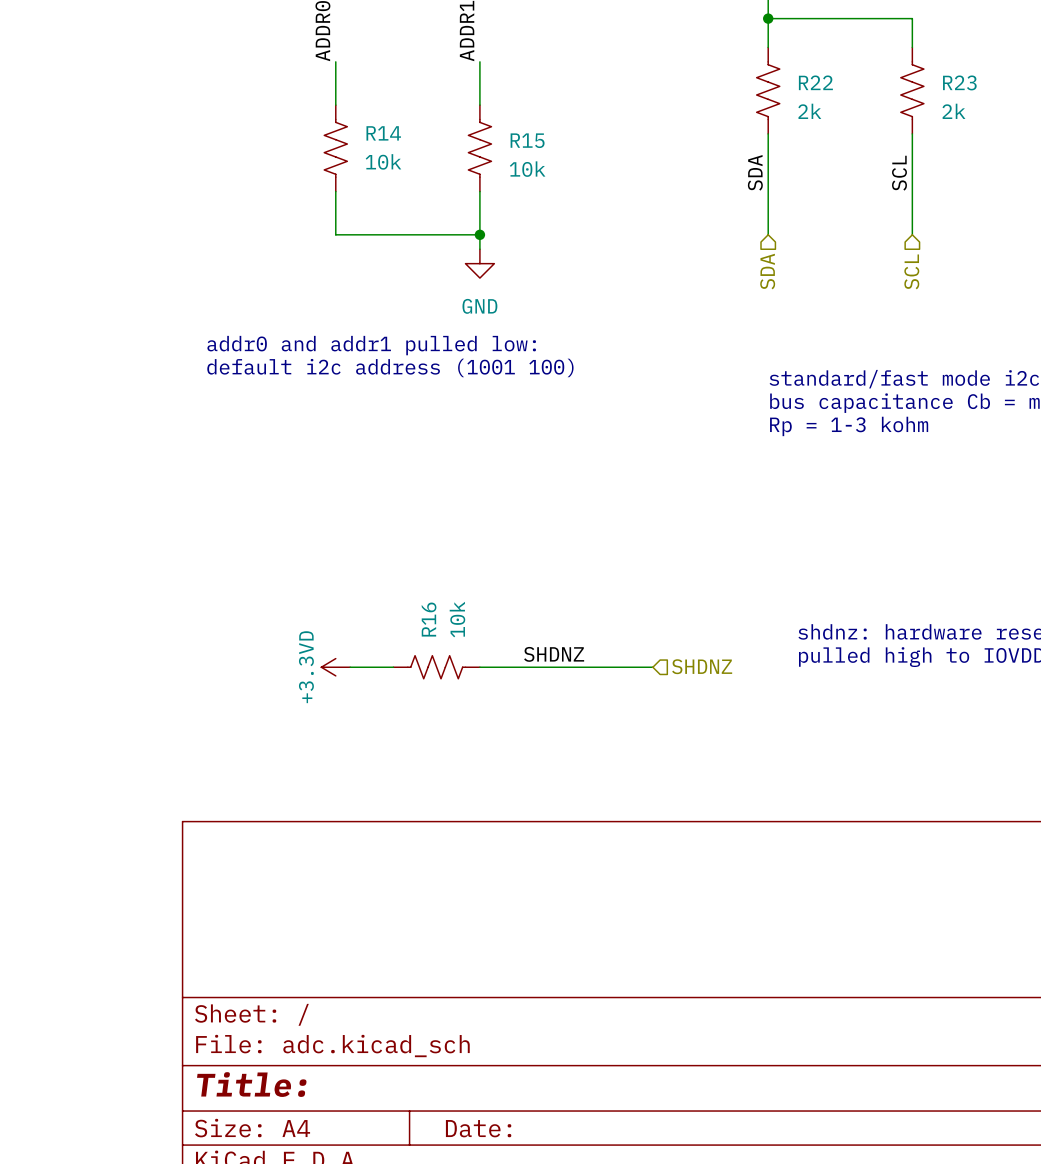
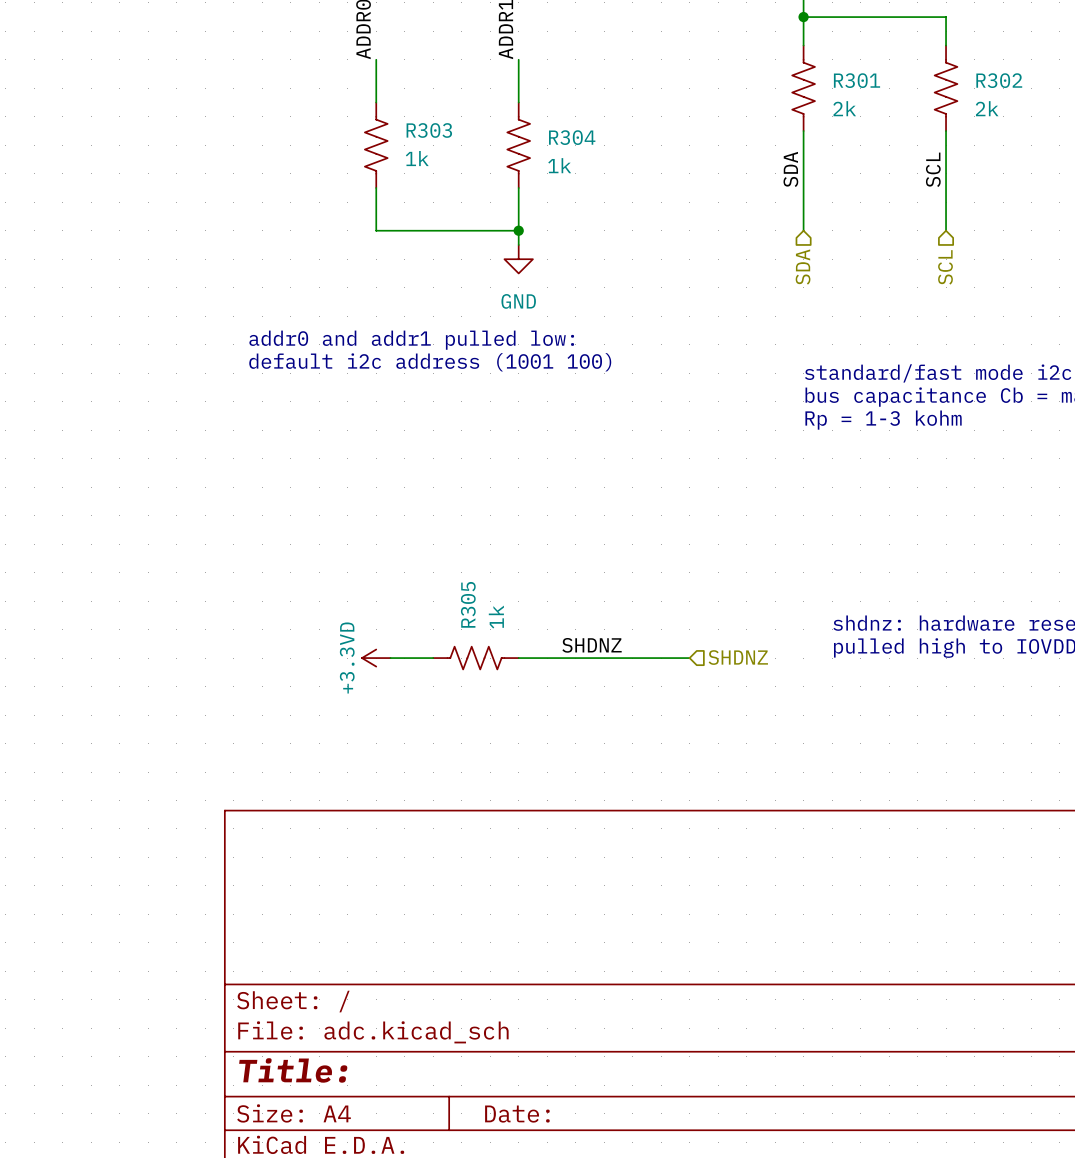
R22 name: R22 (815, 82) -> R301 (857, 80)
R23 name: R23 (959, 82) -> R302 (999, 80)
R14 name: R14 (383, 133) -> R303 (429, 130)
R15 name: R15 (527, 140) -> R304 (572, 137)
R14 value: 10k (383, 161) -> 1k (417, 158)
R15 value: 10k (527, 169) -> 1k (559, 165)
R16 name: R16 (429, 619) -> R305 (468, 604)
R16 value: 10k (457, 619) -> 1k (496, 617)

